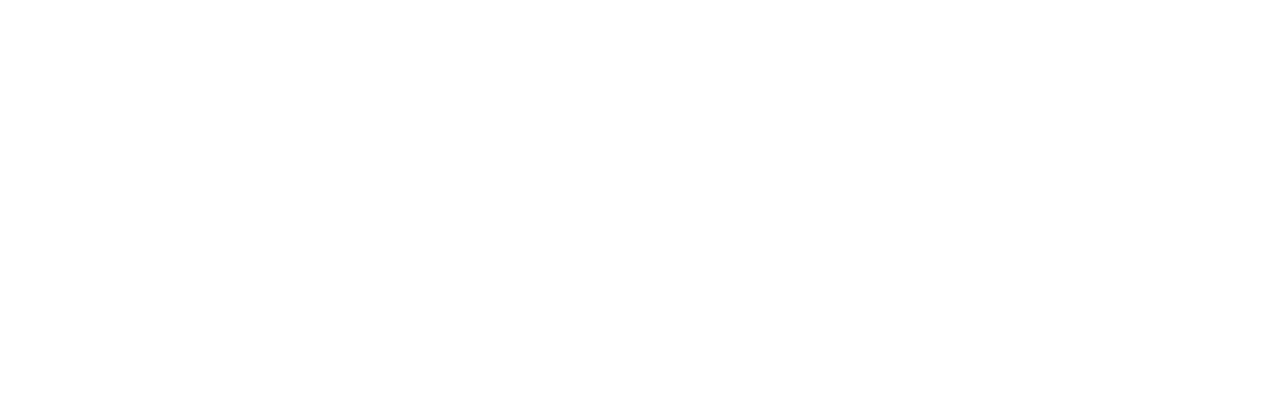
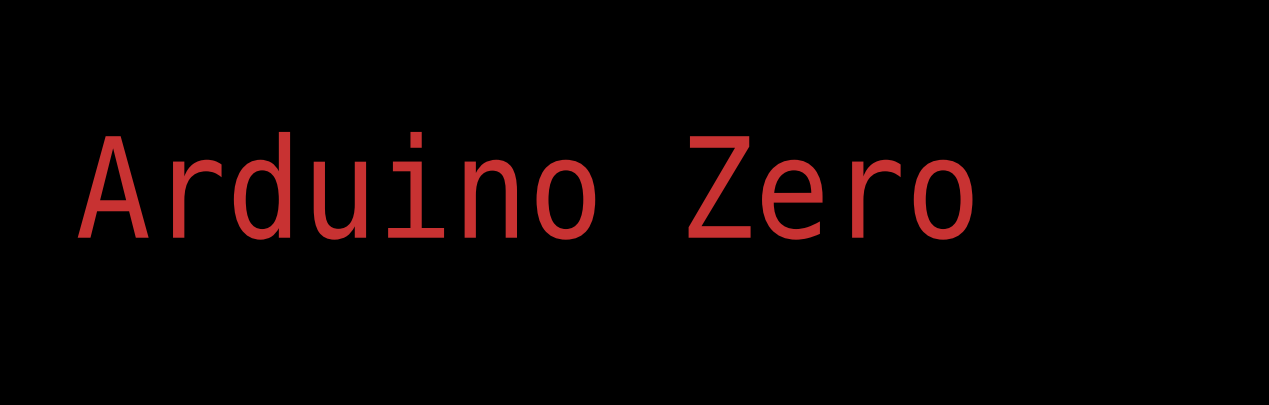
text: none -> Arduino Zero (525, 185)

